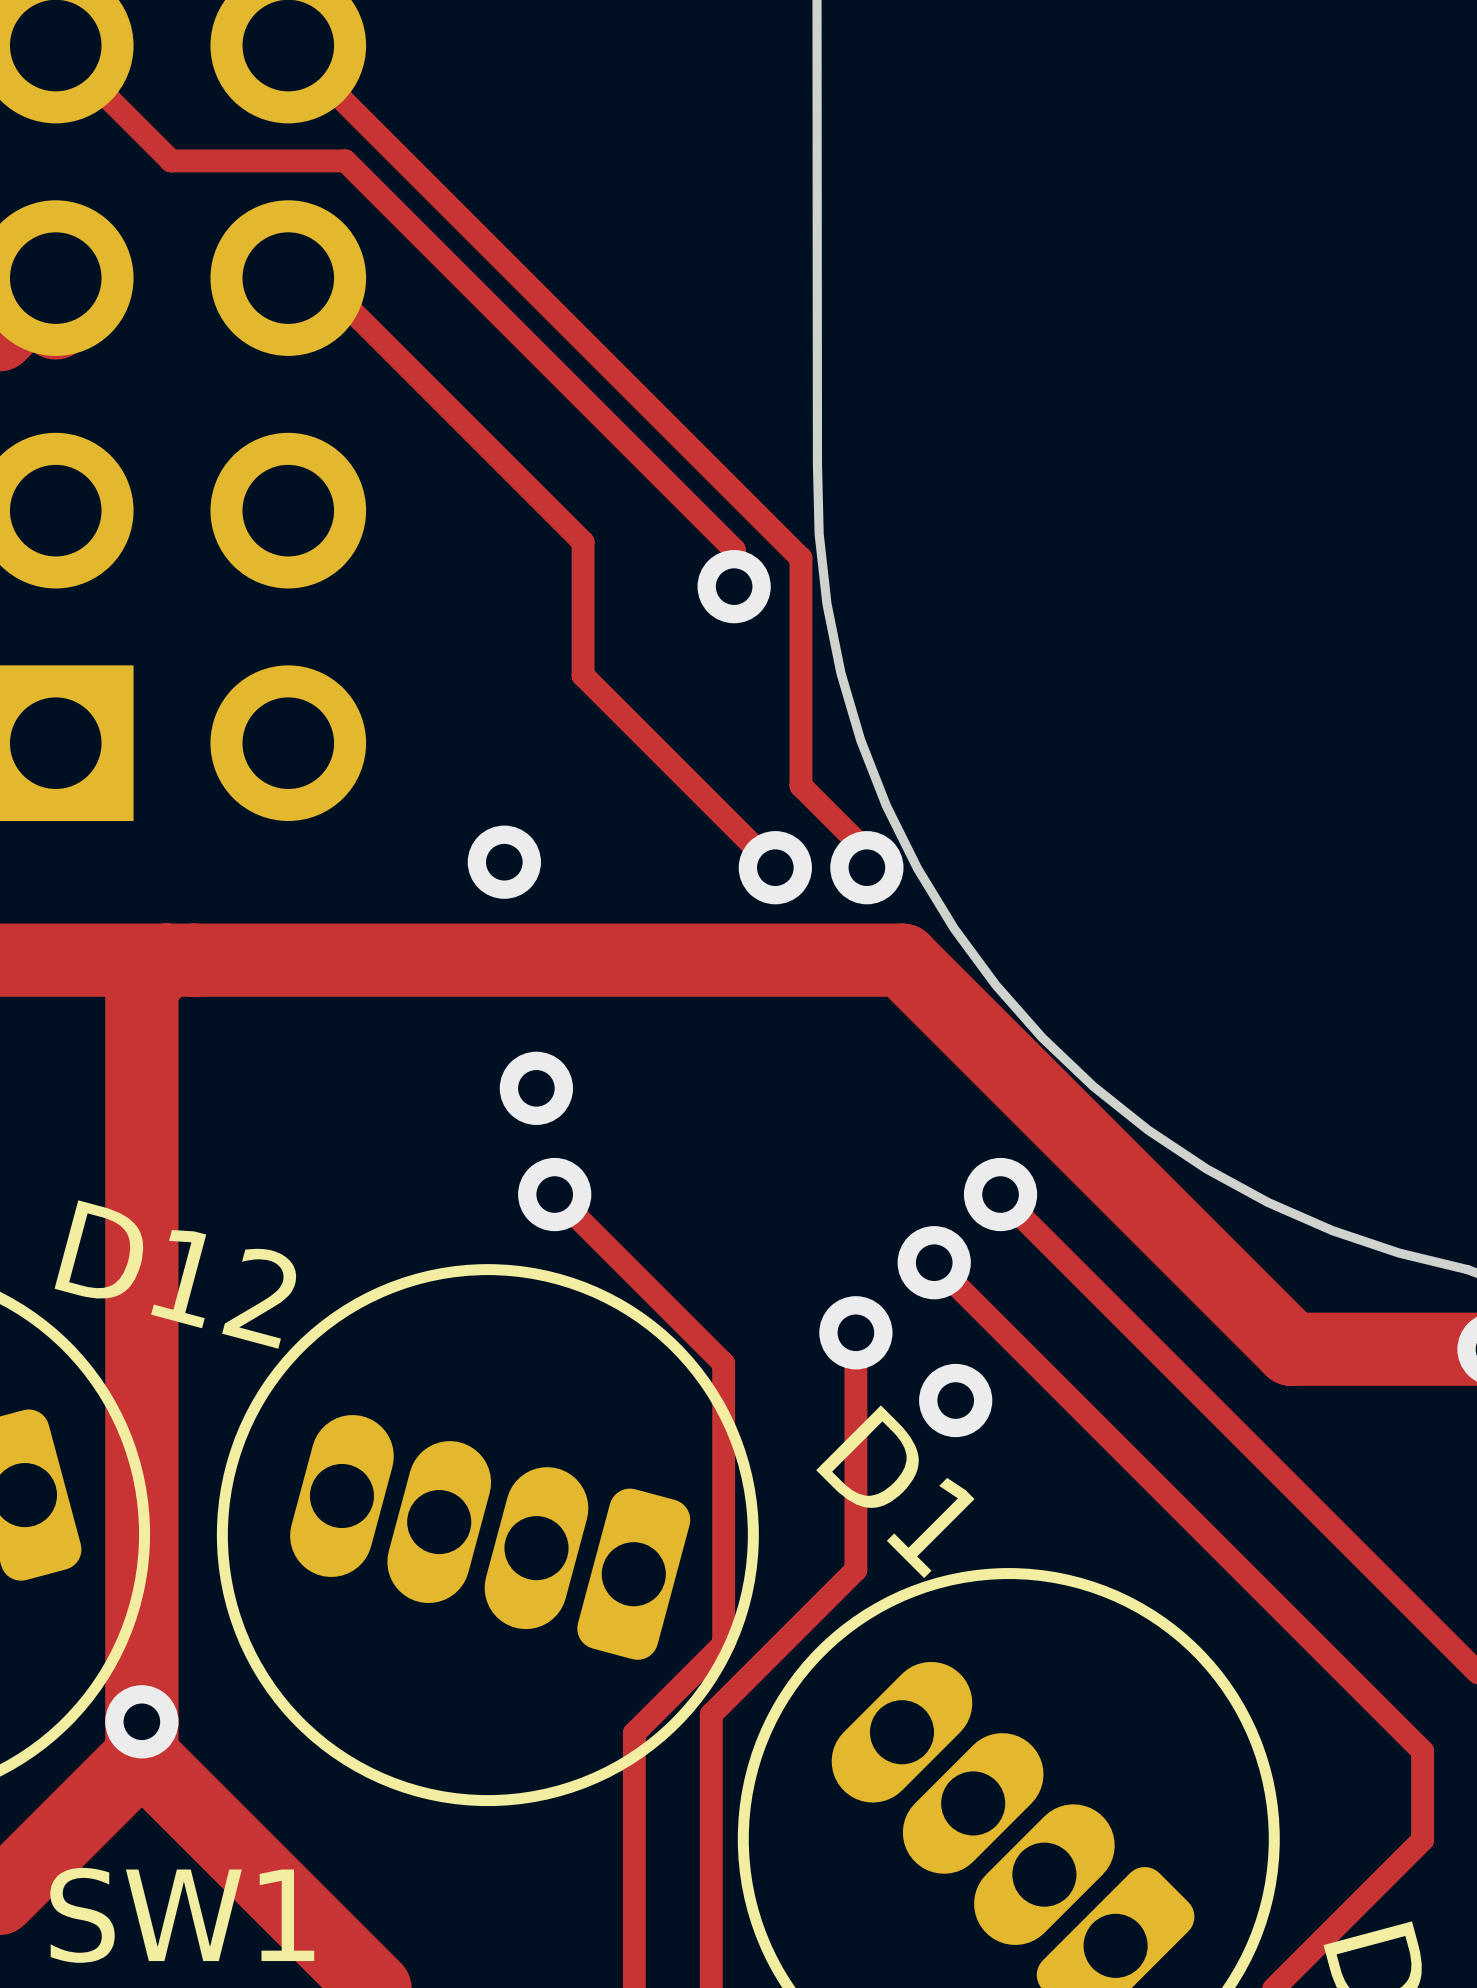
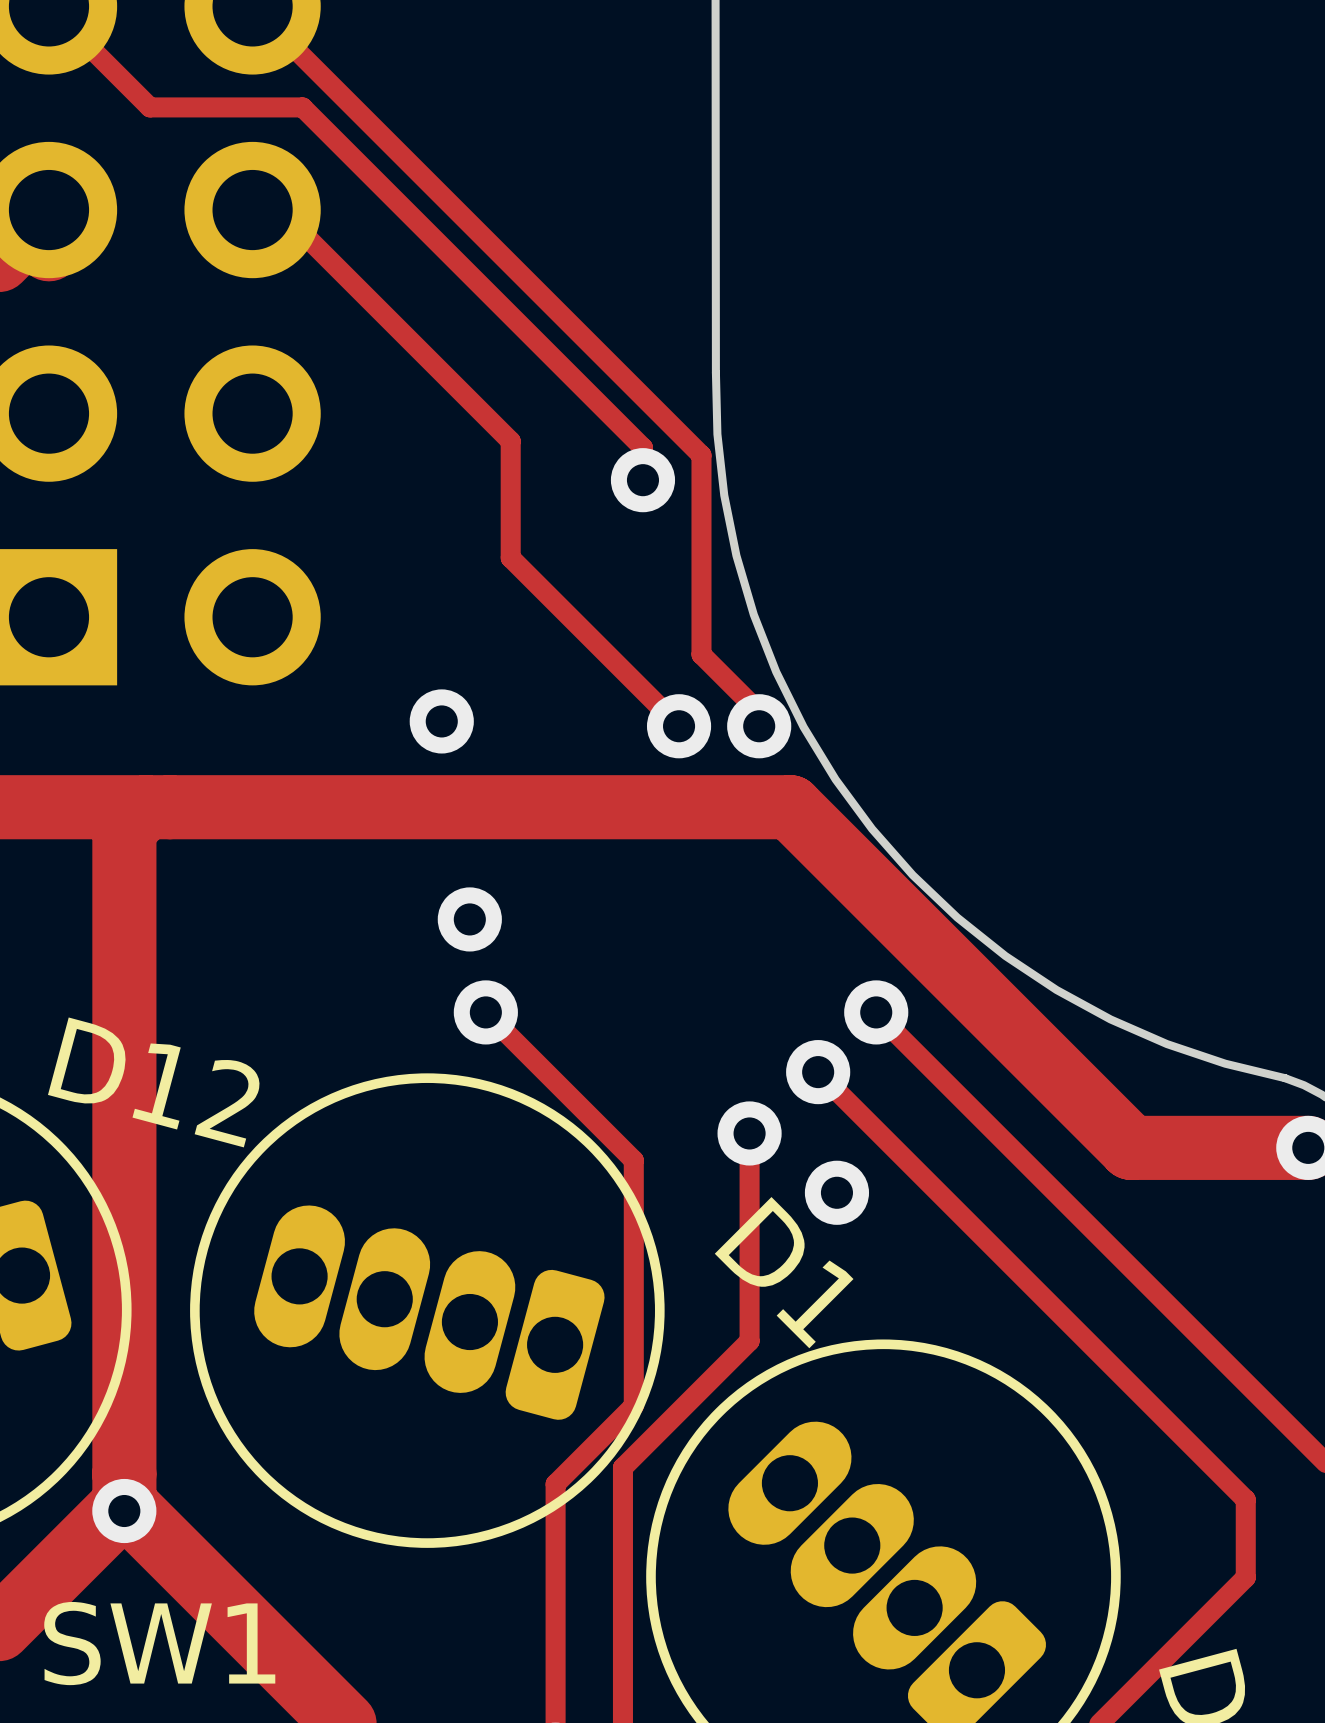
via position: (141, 1721) -> (124, 1511)

